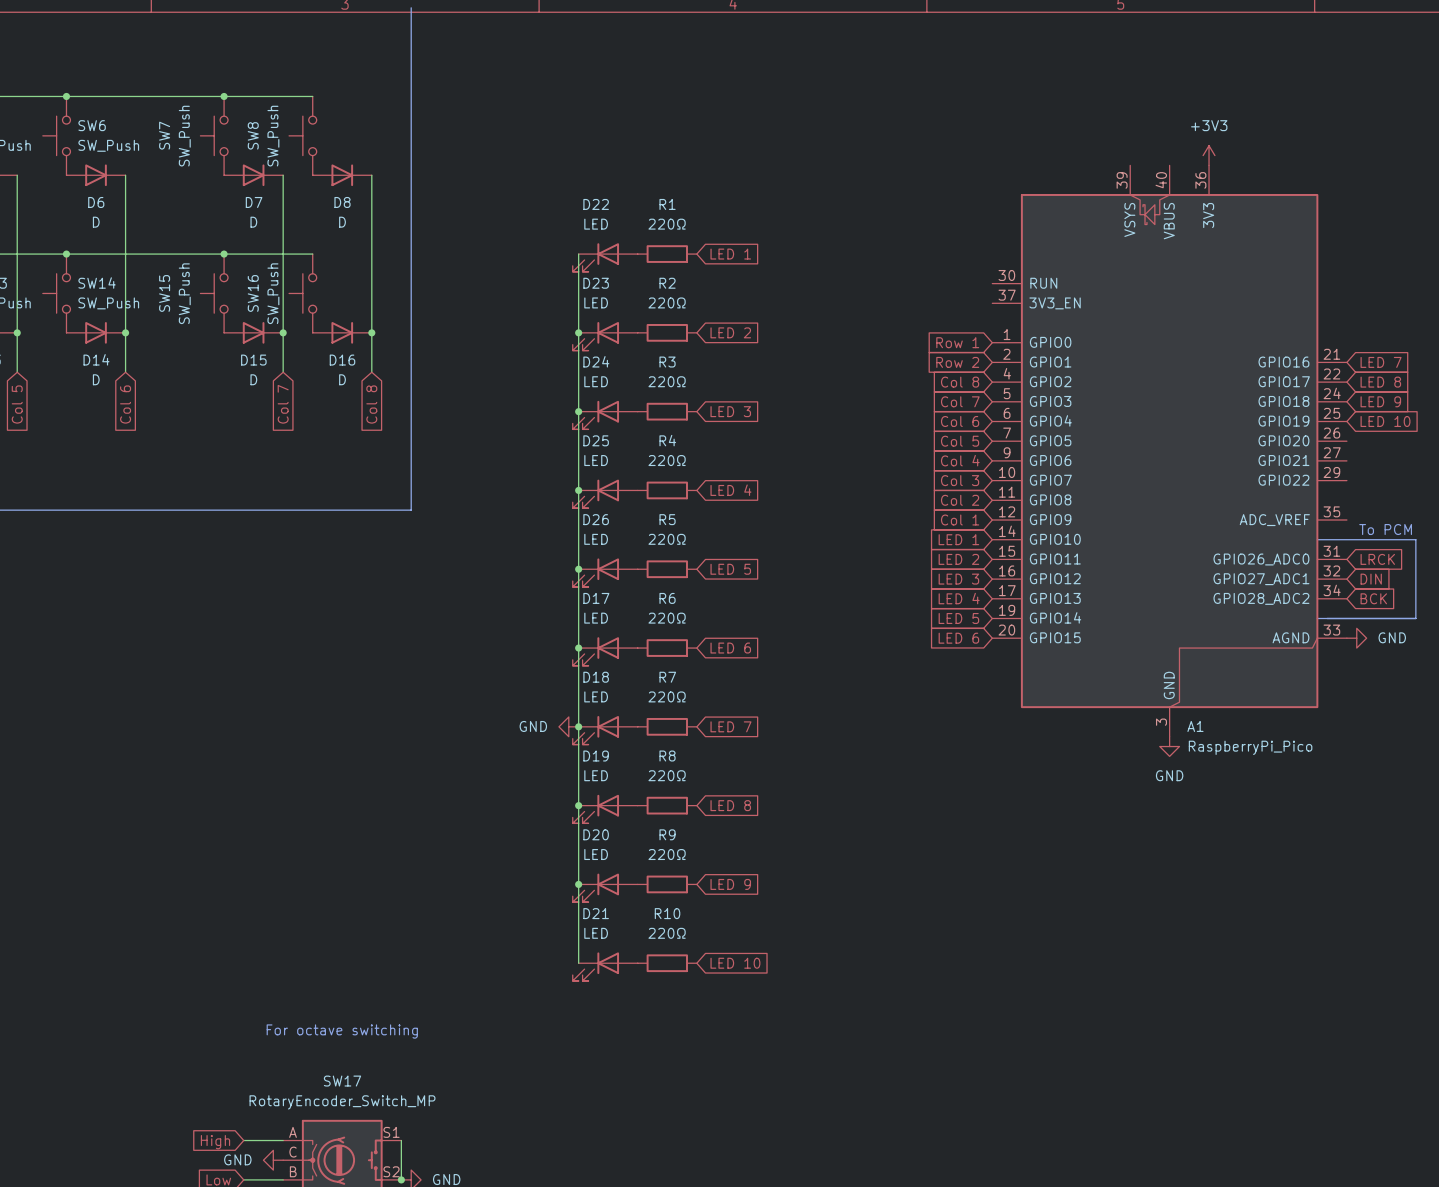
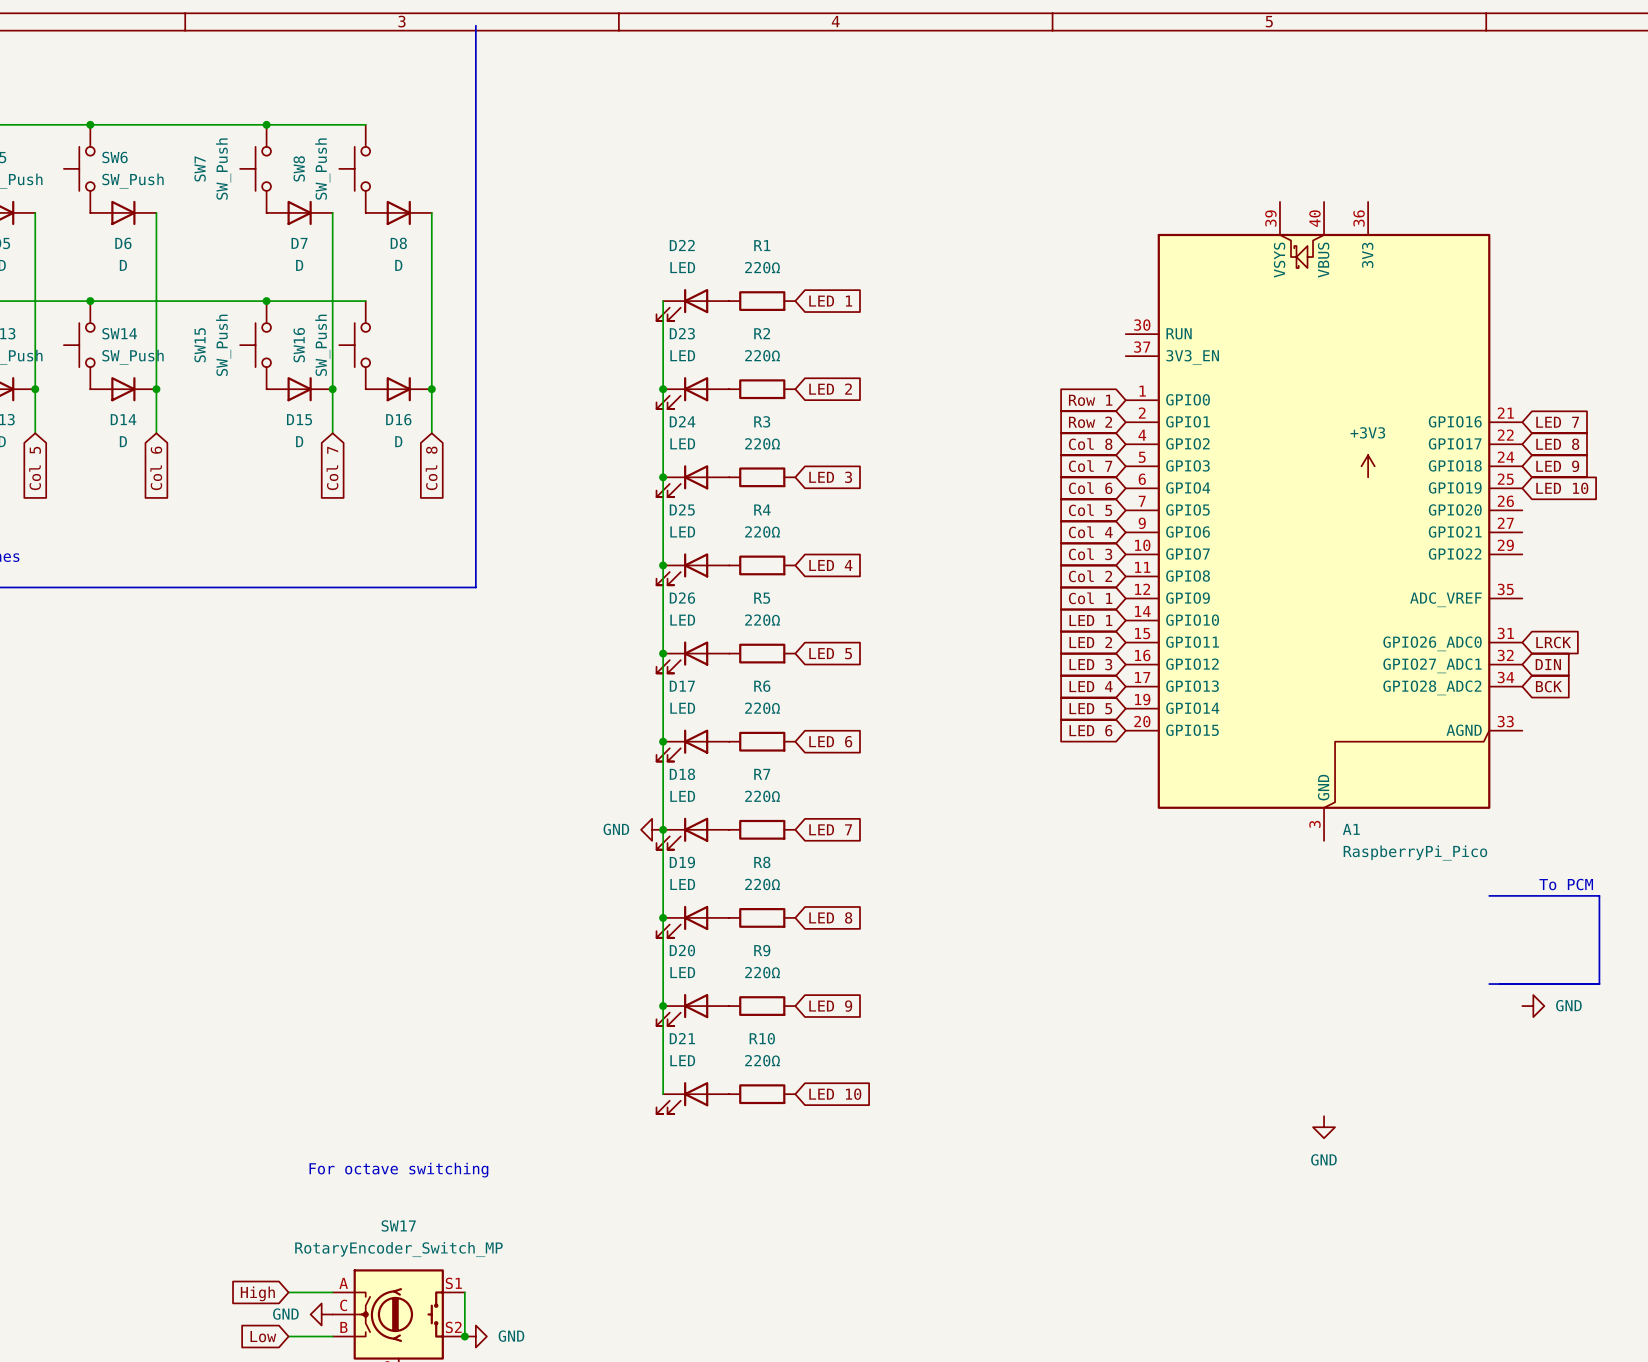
power symbol: +3V3 (1209, 155) -> none
power symbol: none -> +3V3 (1368, 466)
text: To PCM (1385, 529) -> none
line: (1317, 539) (1415, 539) (1415, 618) (1317, 618) -> none
power symbol: GND (1356, 638) -> none
power symbol: GND (1169, 746) -> none
text: none -> To PCM (1566, 884)
line: none -> (1489, 895) (1599, 895) (1599, 984) (1489, 984)
power symbol: none -> GND (1533, 1006)
power symbol: none -> GND (1324, 1127)

